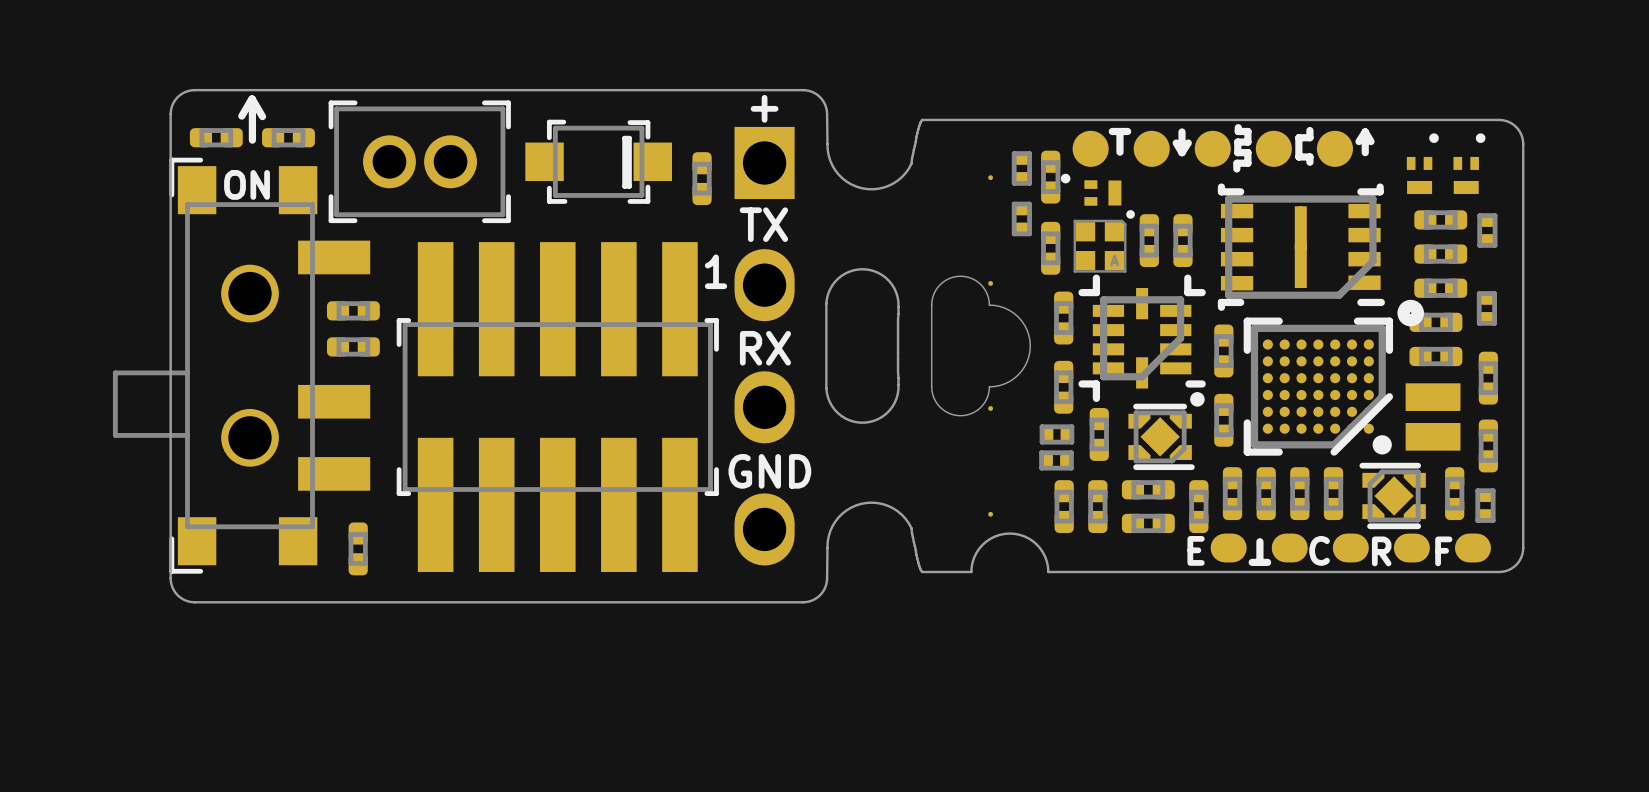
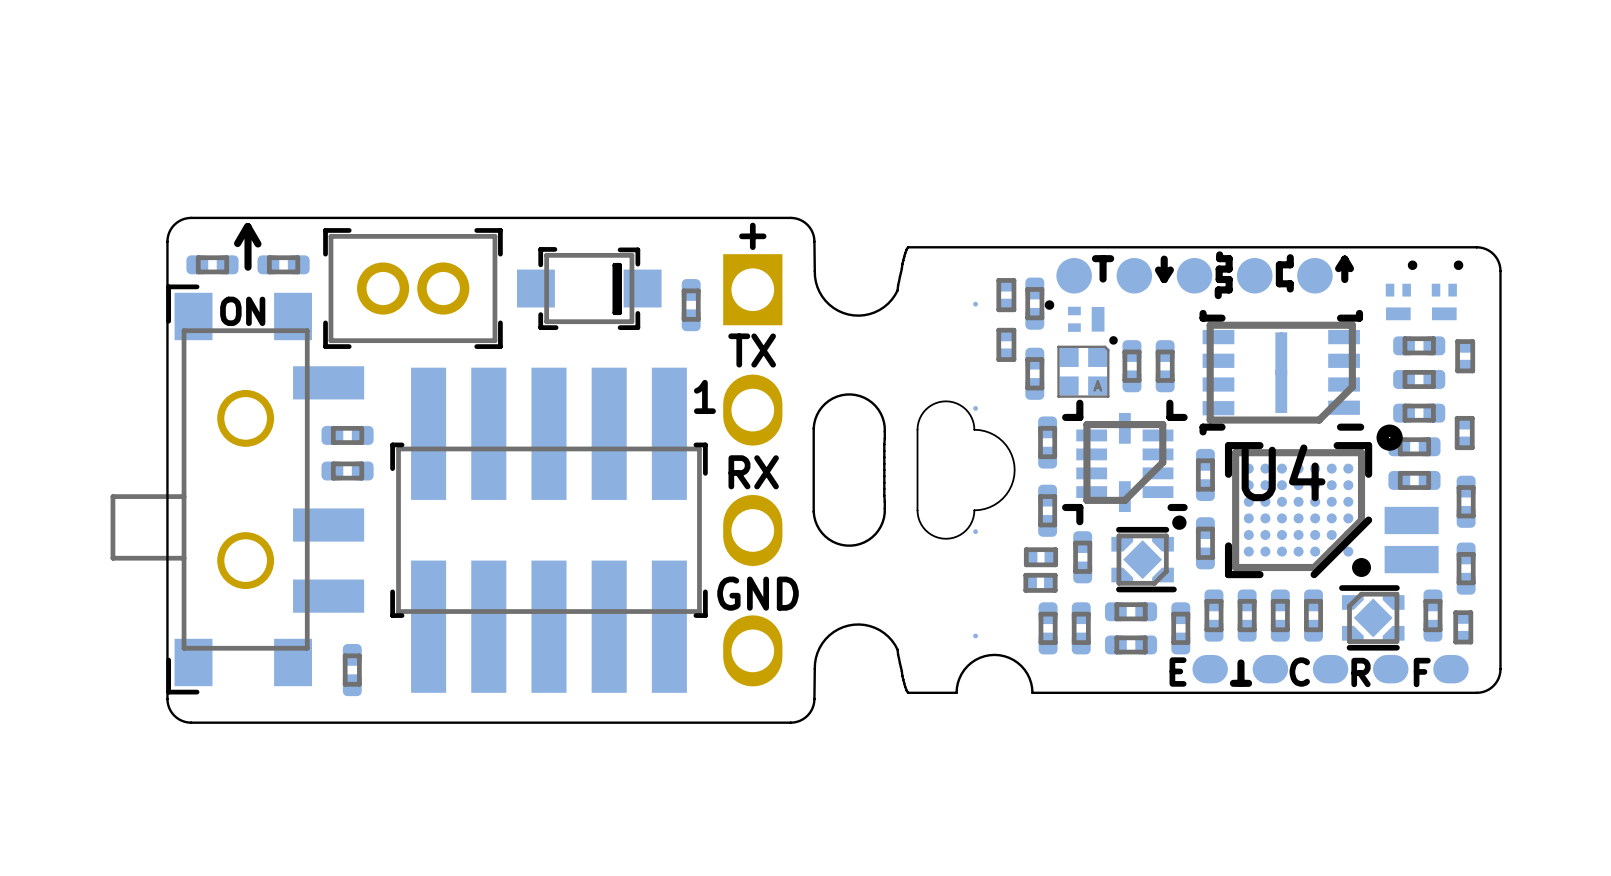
U4 name: none -> U4 (1283, 472)

